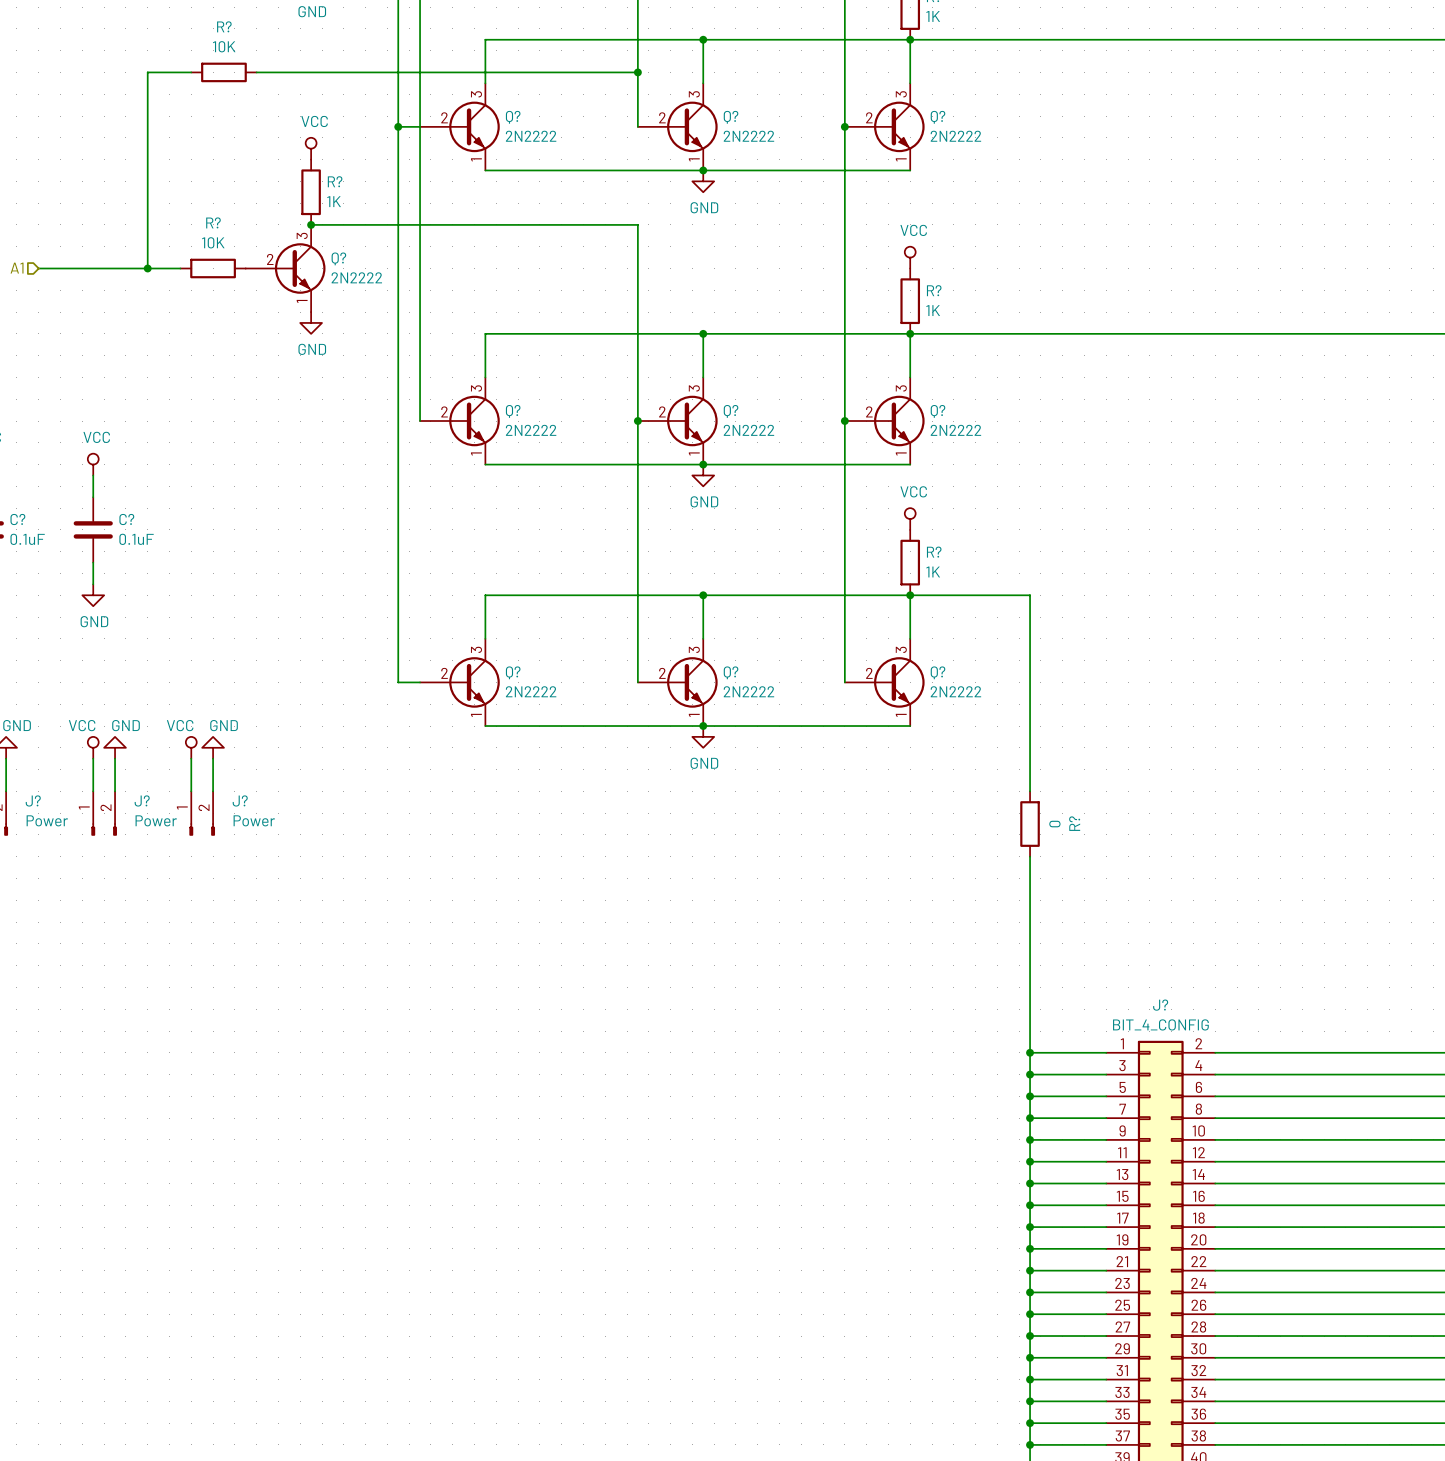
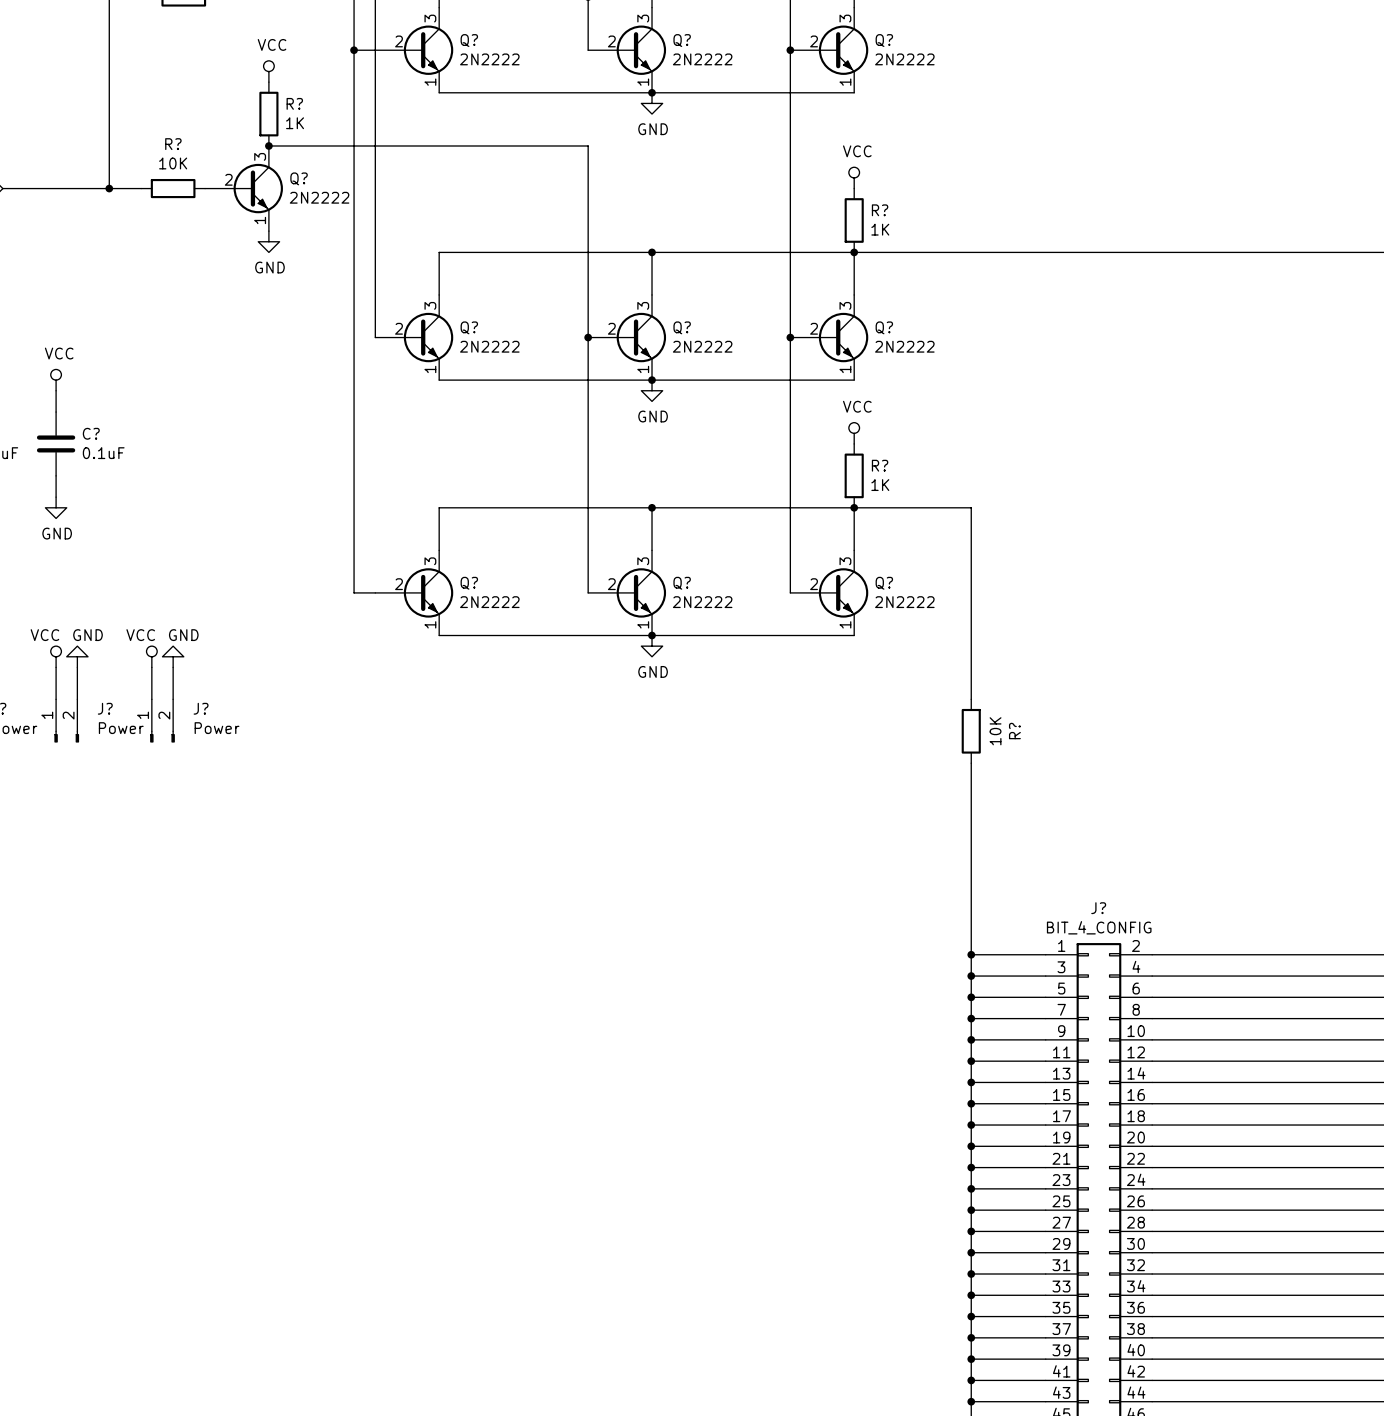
R? value: 0 (1054, 824) -> 10K (995, 731)

